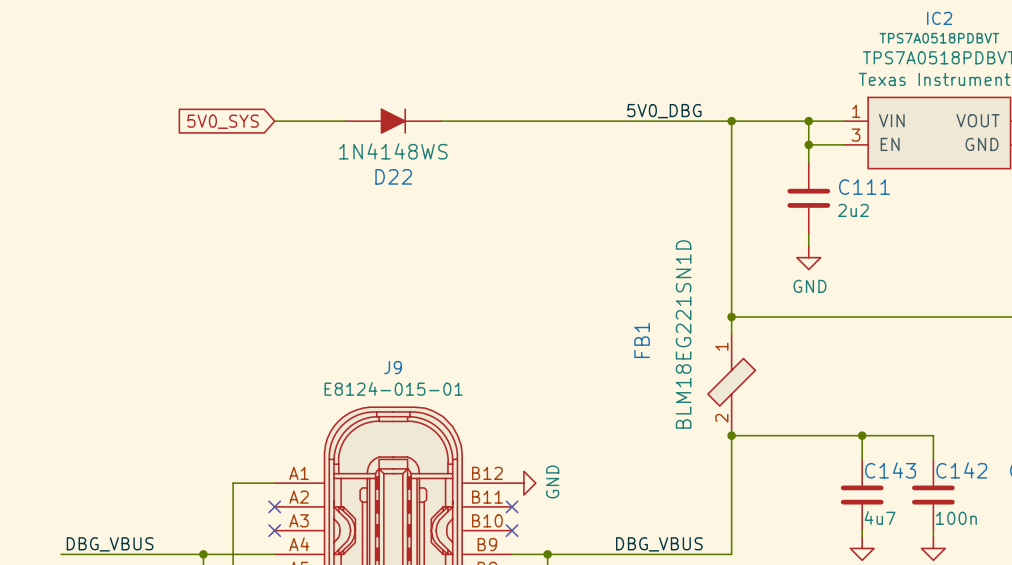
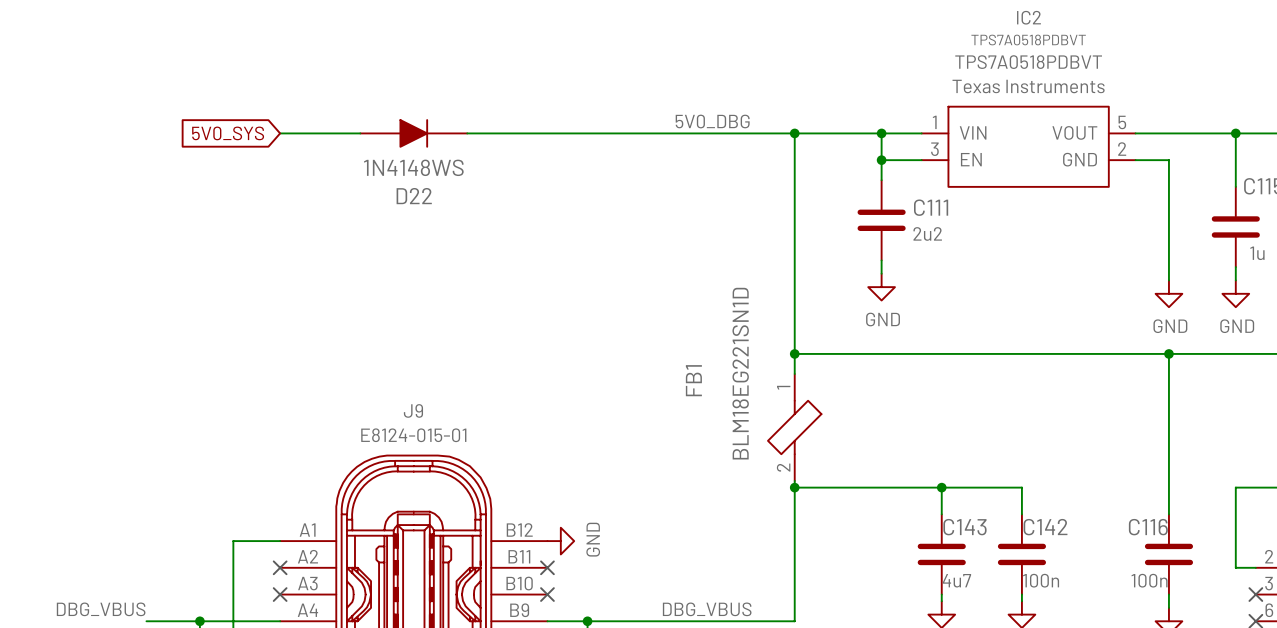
wire: (61, 554) (155, 554) -> none

